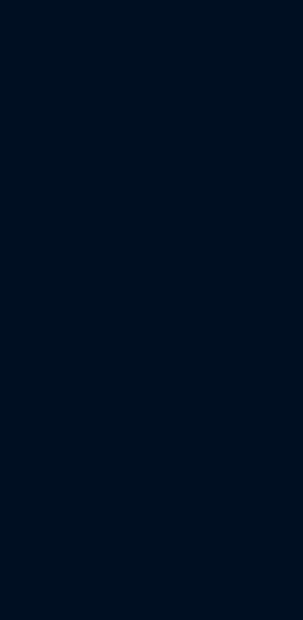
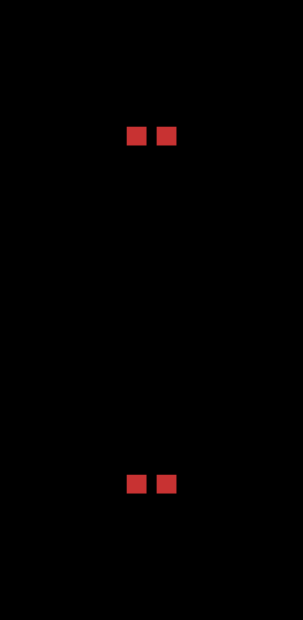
part: none -> (151, 136)
part: none -> (151, 484)

